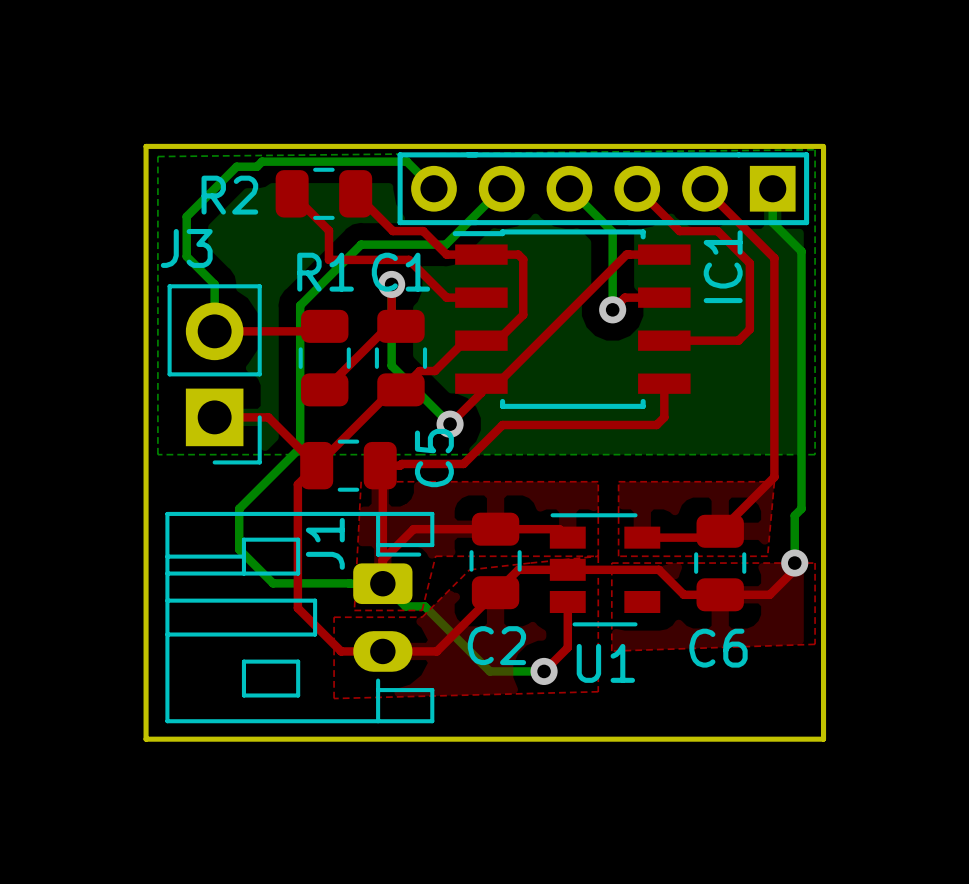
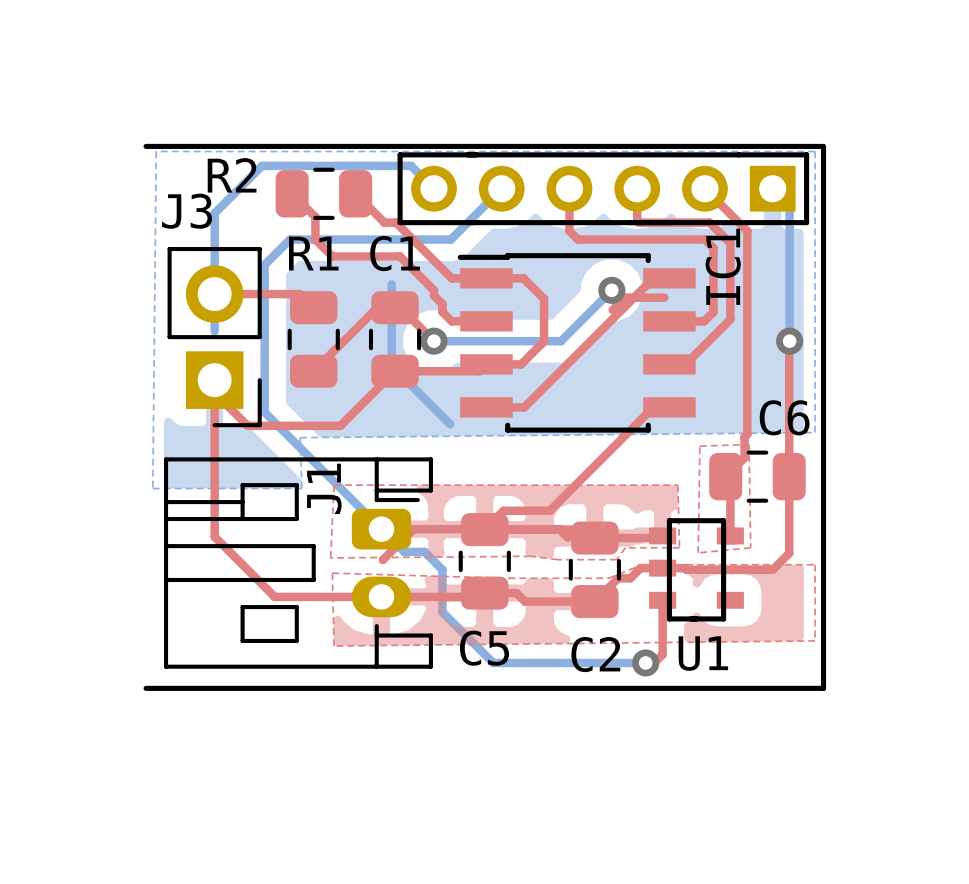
board edge: (146, 146) (146, 739) (823, 739) (823, 688) -> (146, 688) (823, 688)
bottom zone outline: (815, 151) (815, 149) (157, 156) (157, 454) (815, 454) (815, 432) -> (815, 151) (156, 151) (152, 488) (301, 488) (300, 437) (815, 432)
bottom track: (411, 165) (406, 161) (262, 161) (257, 166) (236, 166) (186, 216) (186, 256) (214, 284) -> (411, 165) (262, 165) (214, 213) (214, 284)
top track: none -> (569, 188) (569, 231) (577, 239) (704, 239) (713, 248) (713, 312) (704, 321) (669, 321)
bottom track: (569, 188) (612, 231) (612, 309) -> none
top track: (637, 188) (679, 231) (717, 231) (749, 263) (749, 329) (738, 340) (664, 340) -> (637, 188) (638, 222) (709, 222) (730, 243) (730, 319) (685, 364) (669, 364)
bottom track: (772, 188) (772, 222) (801, 251) (801, 508) (794, 515) (794, 563) -> (772, 188) (789, 205) (789, 341)
R2 name position: R2 (229, 195) -> R2 (232, 175)
top track: (315, 217) (328, 230) (328, 259) (408, 259) (446, 297) (481, 297) -> (315, 217) (315, 239) (332, 256) (400, 256) (433, 290) (433, 295) (442, 304) (442, 312) (451, 321) (486, 321)
top track: (384, 222) (392, 231) (423, 231) (446, 254) (518, 254) (523, 259) (523, 314) (497, 340) (465, 340) (434, 371) (419, 371) (400, 389) (392, 389) (297, 484) (297, 608) (341, 651) (436, 651) (518, 569) (658, 569) (683, 594) (769, 594) (794, 569) (794, 563) -> (384, 222) (396, 222) (451, 278) (523, 278) (544, 298) (544, 341) (521, 364) (486, 364) (479, 371) (395, 371) (340, 425) (247, 425) (214, 392)
top track: (747, 231) (774, 258) (774, 477) (713, 537) (642, 537) -> (747, 231) (747, 434) (744, 437) (744, 457) (725, 476) (730, 481) (730, 535)
bottom track: (450, 239) (445, 244) (361, 244) (300, 305) (300, 447) (239, 508) (239, 549) (273, 583) (349, 583) -> (450, 239) (290, 239) (264, 264) (264, 412) (404, 551) (424, 551) (442, 569) (442, 612) (493, 662) (645, 662)
top track: (664, 254) (626, 254) (497, 383) (481, 383) (481, 392) (450, 424) -> none
top track: none -> (653, 278) (524, 407) (486, 407)
top track: (391, 284) (391, 317) (400, 326) (388, 326) (324, 389) -> none
via: (391, 284) -> none
bottom track: none -> (611, 290) (561, 341) (433, 341)
top track: none -> (214, 294) (300, 294) (313, 307)
via position: (612, 309) -> (611, 290)
IC1 position: (571, 319) -> (576, 342)
top track: (324, 326) (319, 331) (214, 331) -> none
top track: none -> (433, 341) (400, 307) (377, 307) (313, 371)
via: none -> (433, 341)
top track: none -> (789, 341) (789, 553) (772, 569) (640, 568) (630, 578) (618, 578) (594, 601) (525, 601) (516, 593) (484, 593) (480, 596) (274, 596) (214, 536) (214, 380)
via: none -> (789, 341)
R1 position: (324, 358) -> (313, 339)
C1 position: (400, 358) -> (395, 339)
J3 position: (214, 374) -> (214, 337)
top track: (664, 383) (664, 417) (656, 425) (502, 425) (463, 463) (380, 465) (382, 468) (382, 583) -> none
top track: none -> (669, 407) (653, 407) (549, 510) (503, 510) (484, 529) (586, 529) (594, 538) (660, 538) (662, 535)
top track: (214, 417) (268, 417) (316, 465) -> none
via: (450, 424) -> none
top zone outline: none -> (749, 444) (699, 446) (698, 552) (750, 547) (749, 444)
C5 rotation: 0° (348, 465) -> 90° clockwise (484, 561)
C5 position: (348, 465) -> (484, 561)
top zone outline: (361, 481) (598, 481) (598, 691) (334, 698) (334, 617) (422, 617) (469, 569) (530, 563) (598, 556) (435, 556) (422, 610) (354, 610) (361, 481) -> none
top zone outline: (618, 481) (774, 481) (767, 556) (618, 556) (618, 481) -> none
top zone outline: none -> (334, 485) (677, 485) (679, 547) (625, 547) (616, 559) (557, 559) (530, 556) (330, 557) (334, 485)
U1 footprint: [549, 513, 661, 627] -> [649, 518, 744, 622]
C2 position: (495, 560) -> (594, 569)
C6 rotation: 0° (720, 563) -> 90° clockwise (757, 476)
C6 position: (720, 563) -> (757, 476)
via: (794, 563) -> none
top zone outline: (815, 564) (815, 563) (611, 563) (611, 651) (815, 644) (815, 640) -> (815, 564) (642, 564) (608, 578) (508, 578) (332, 573) (334, 646) (815, 640)
bottom track: (349, 583) (382, 583) (405, 606) (424, 606) (489, 671) (544, 671) -> none
top track: none -> (662, 600) (662, 654) (654, 662) (645, 662)
top track: (567, 602) (567, 647) (544, 671) -> none
J1 position: (299, 617) -> (298, 563)
C6 name position: C6 (718, 648) -> C6 (784, 417)
via: none -> (645, 662)
via: (544, 671) -> none

